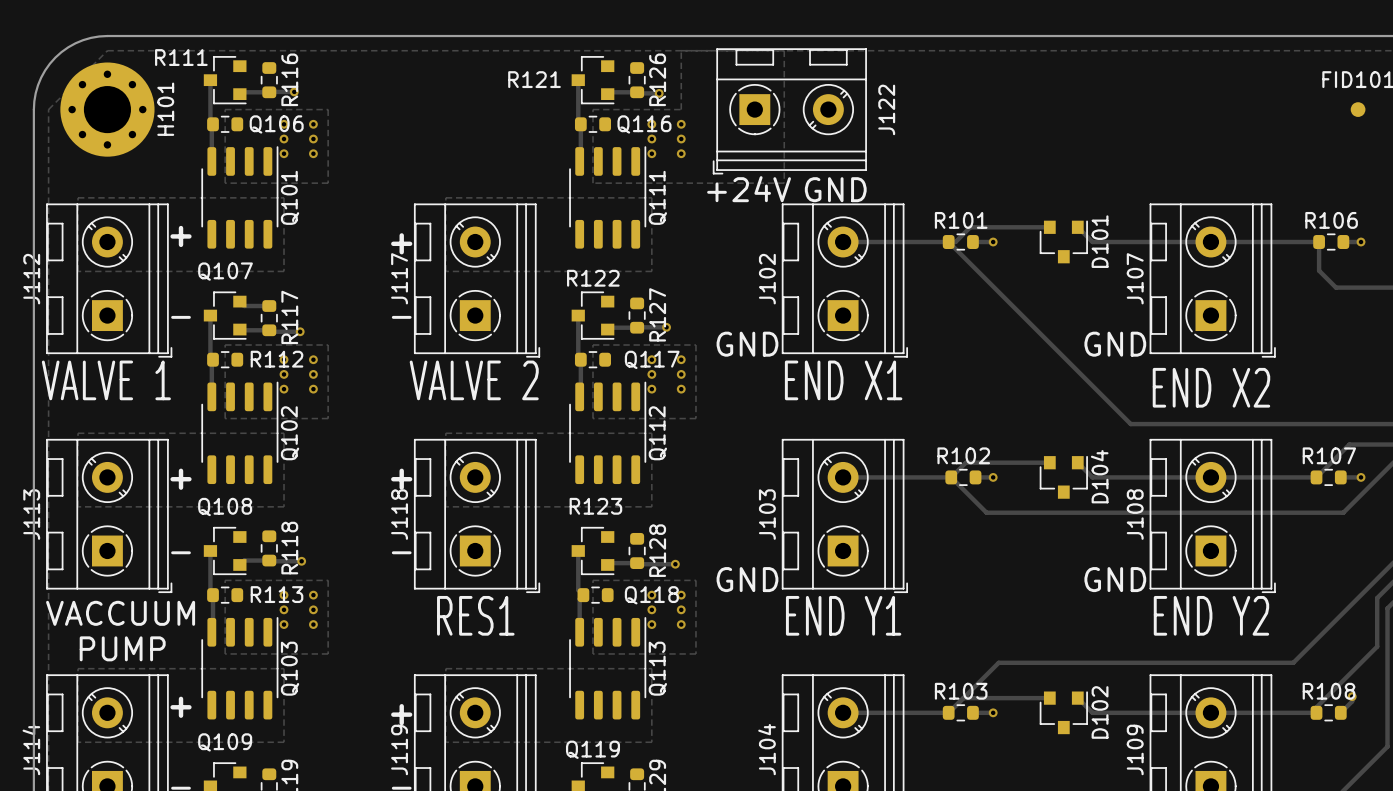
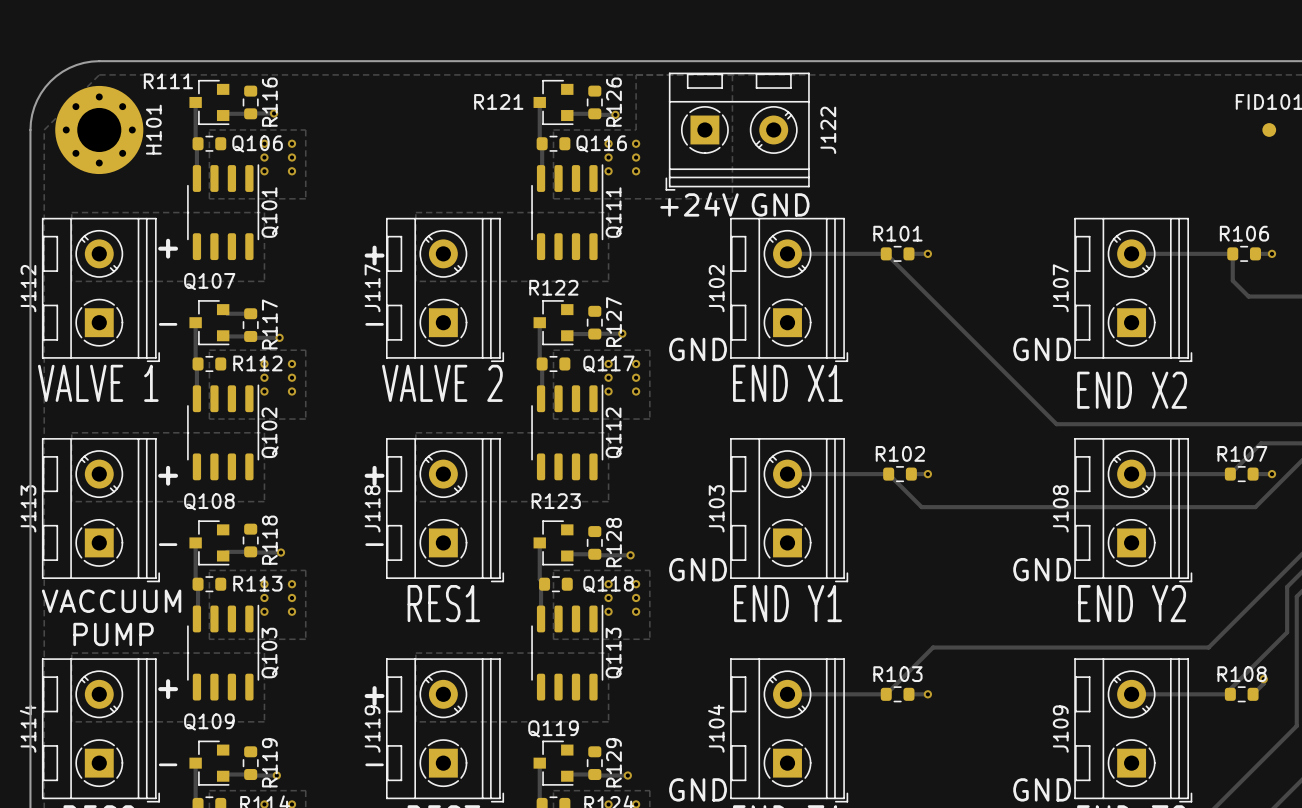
track: (1049, 227) (970, 227) (955, 242) (948, 242) -> none
track: (1077, 227) (1092, 242) (1210, 242) -> none
D101: (1063, 241) -> none
track: (1049, 462) (965, 462) (951, 477) -> none
track: (1077, 462) (1092, 477) (1210, 477) -> none
D104: (1063, 477) -> none
track: (963, 698) (1049, 698) -> none
track: (1077, 698) (1092, 712) (1210, 712) -> none
D102: (1063, 712) -> none

